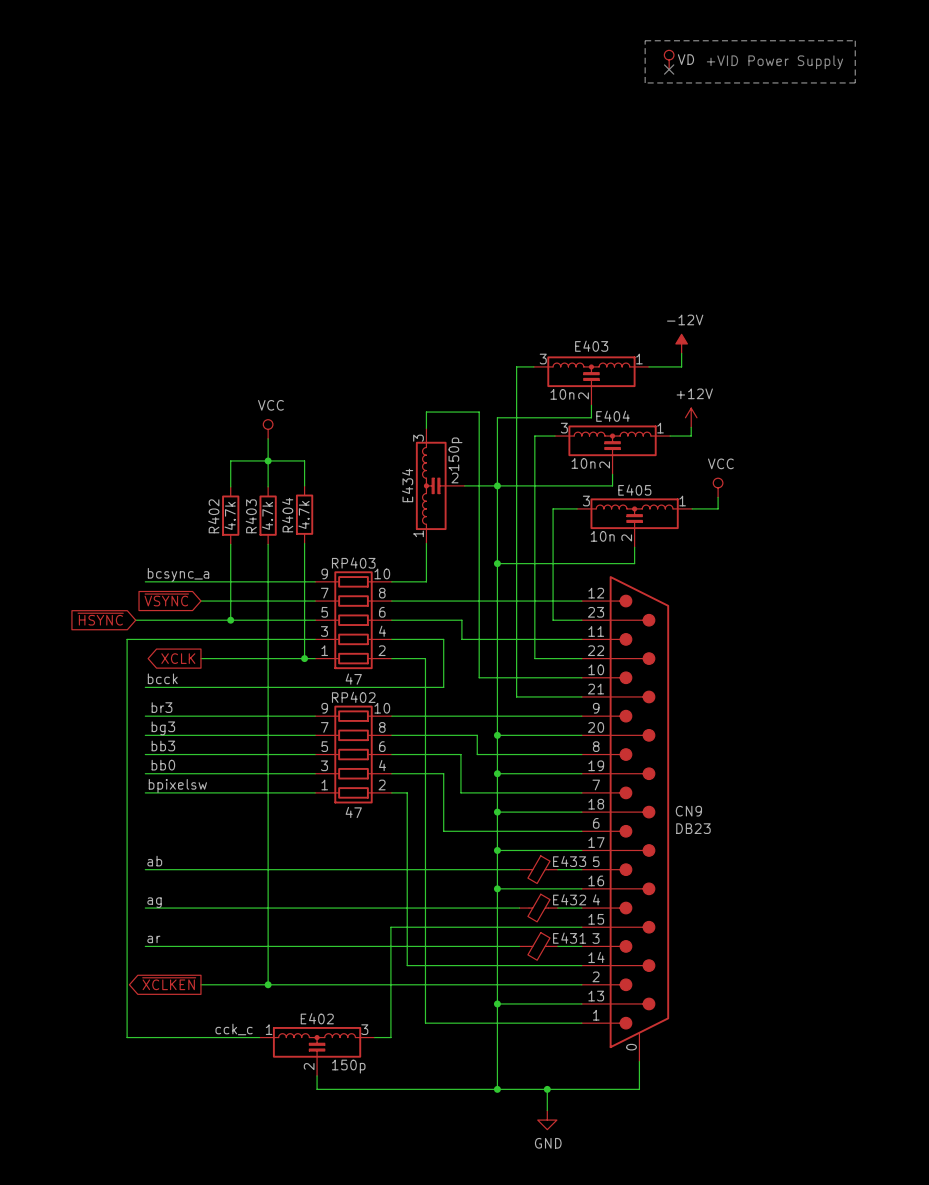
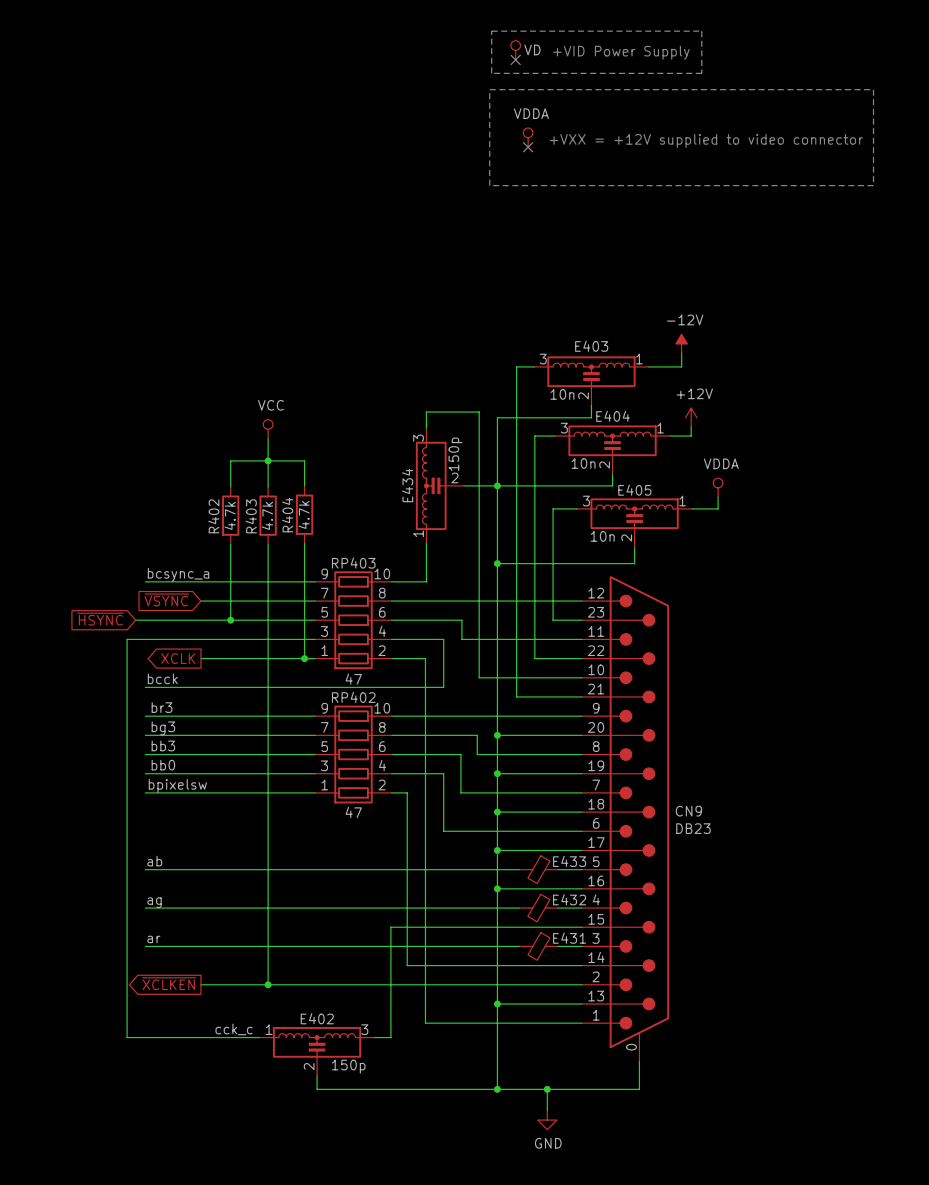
line: (645, 40) (855, 40) (855, 82) (645, 82) (645, 40) -> (491, 31) (701, 31) (701, 73) (491, 73) (491, 31)
no-connect mark: none -> (515, 59)
power symbol position: VD (669, 59) -> VD (515, 50)
text position: +VID Power Supply (774, 62) -> +VID Power Supply (621, 52)
no-connect mark: (669, 69) -> none
line: none -> (489, 89) (873, 89) (873, 185) (489, 185) (489, 89)
power symbol: none -> VDDA (528, 137)
text: none -> +VXX = +12V supplied to video connector (706, 140)
no-connect mark: none -> (528, 147)
power symbol: VCC (718, 487) -> VDDA (718, 487)

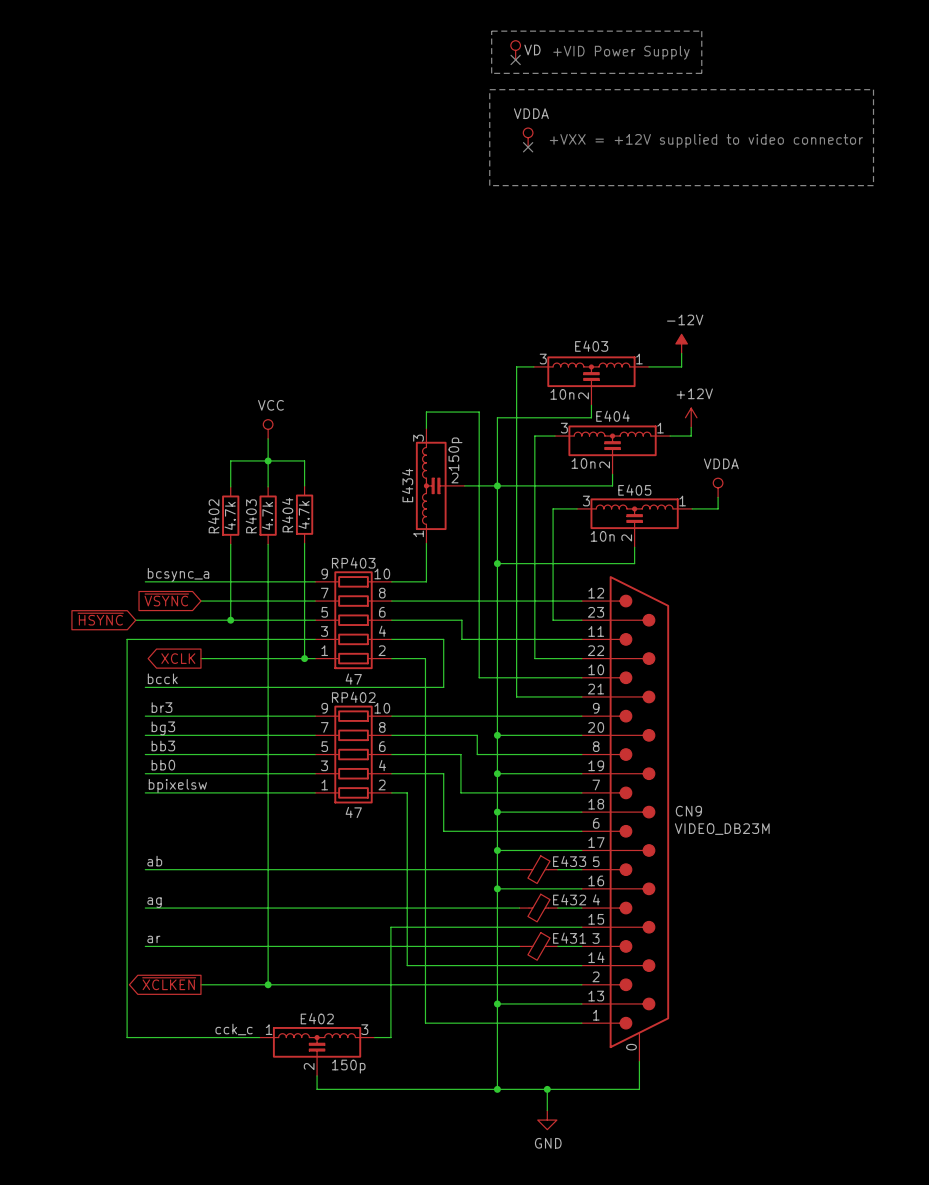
CN9 value: DB23 (693, 828) -> VIDEO_DB23M (722, 829)

